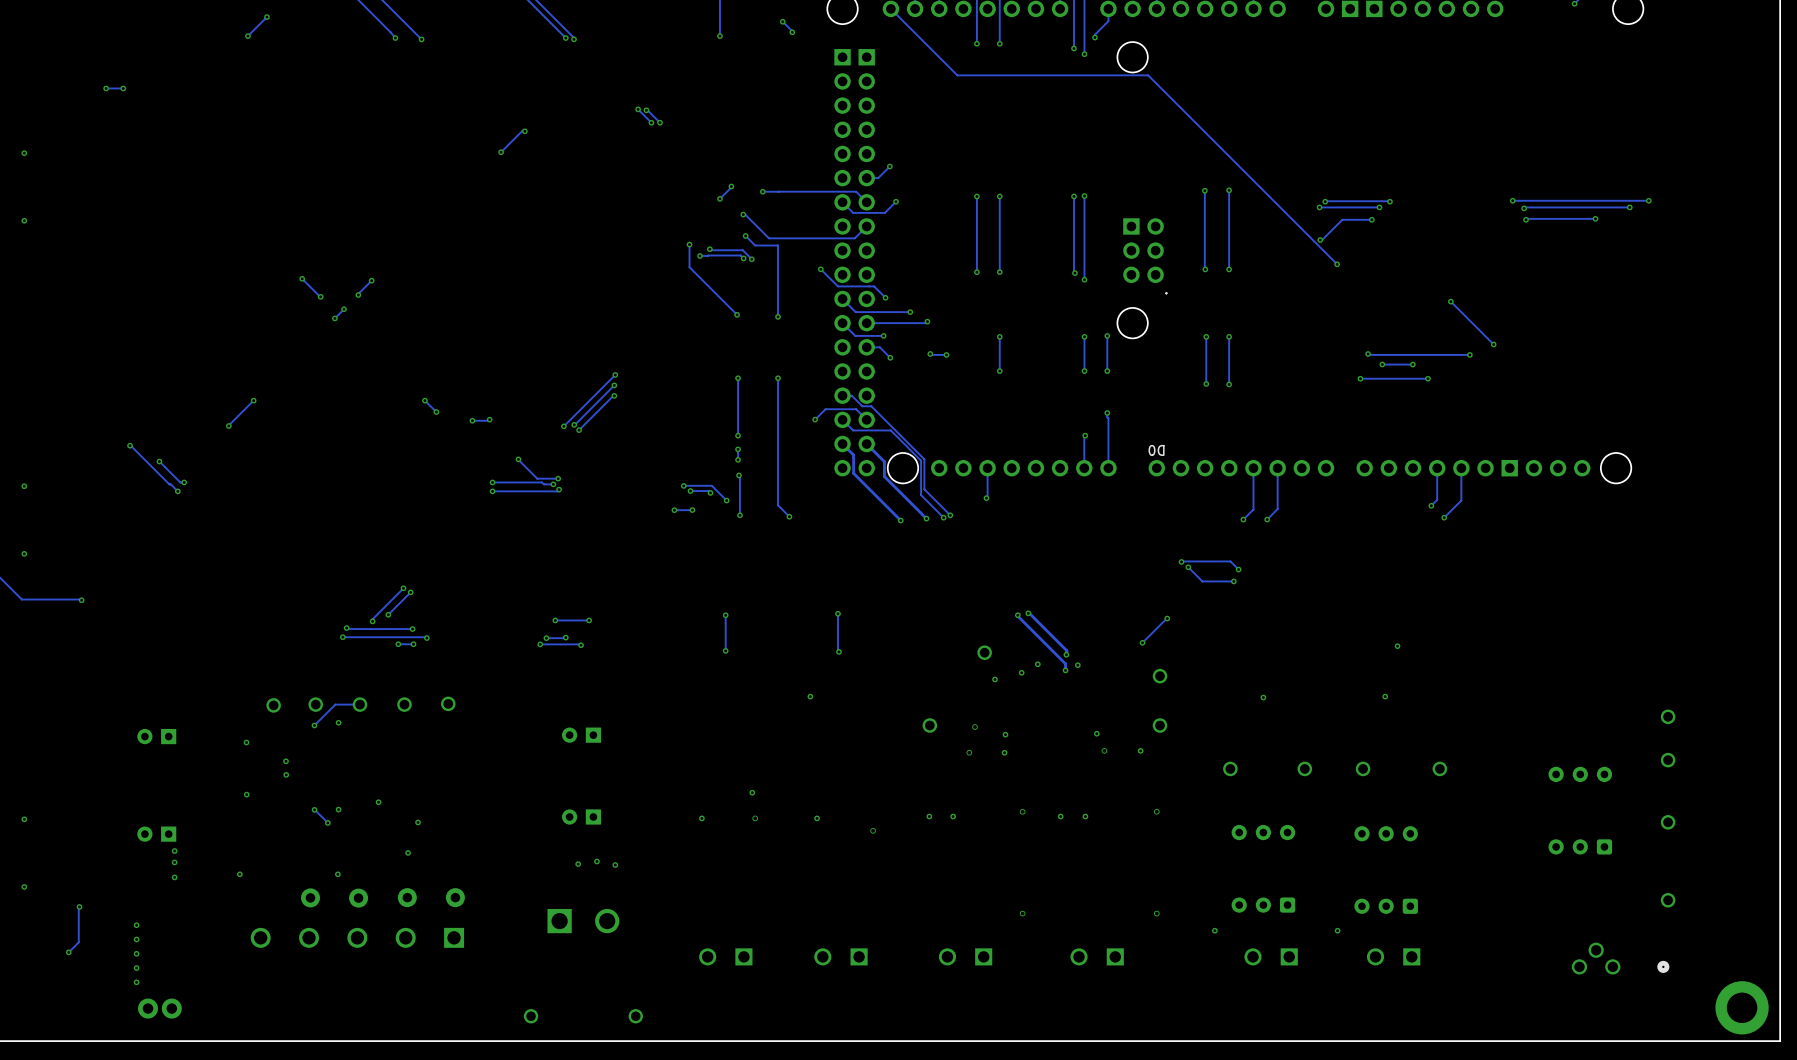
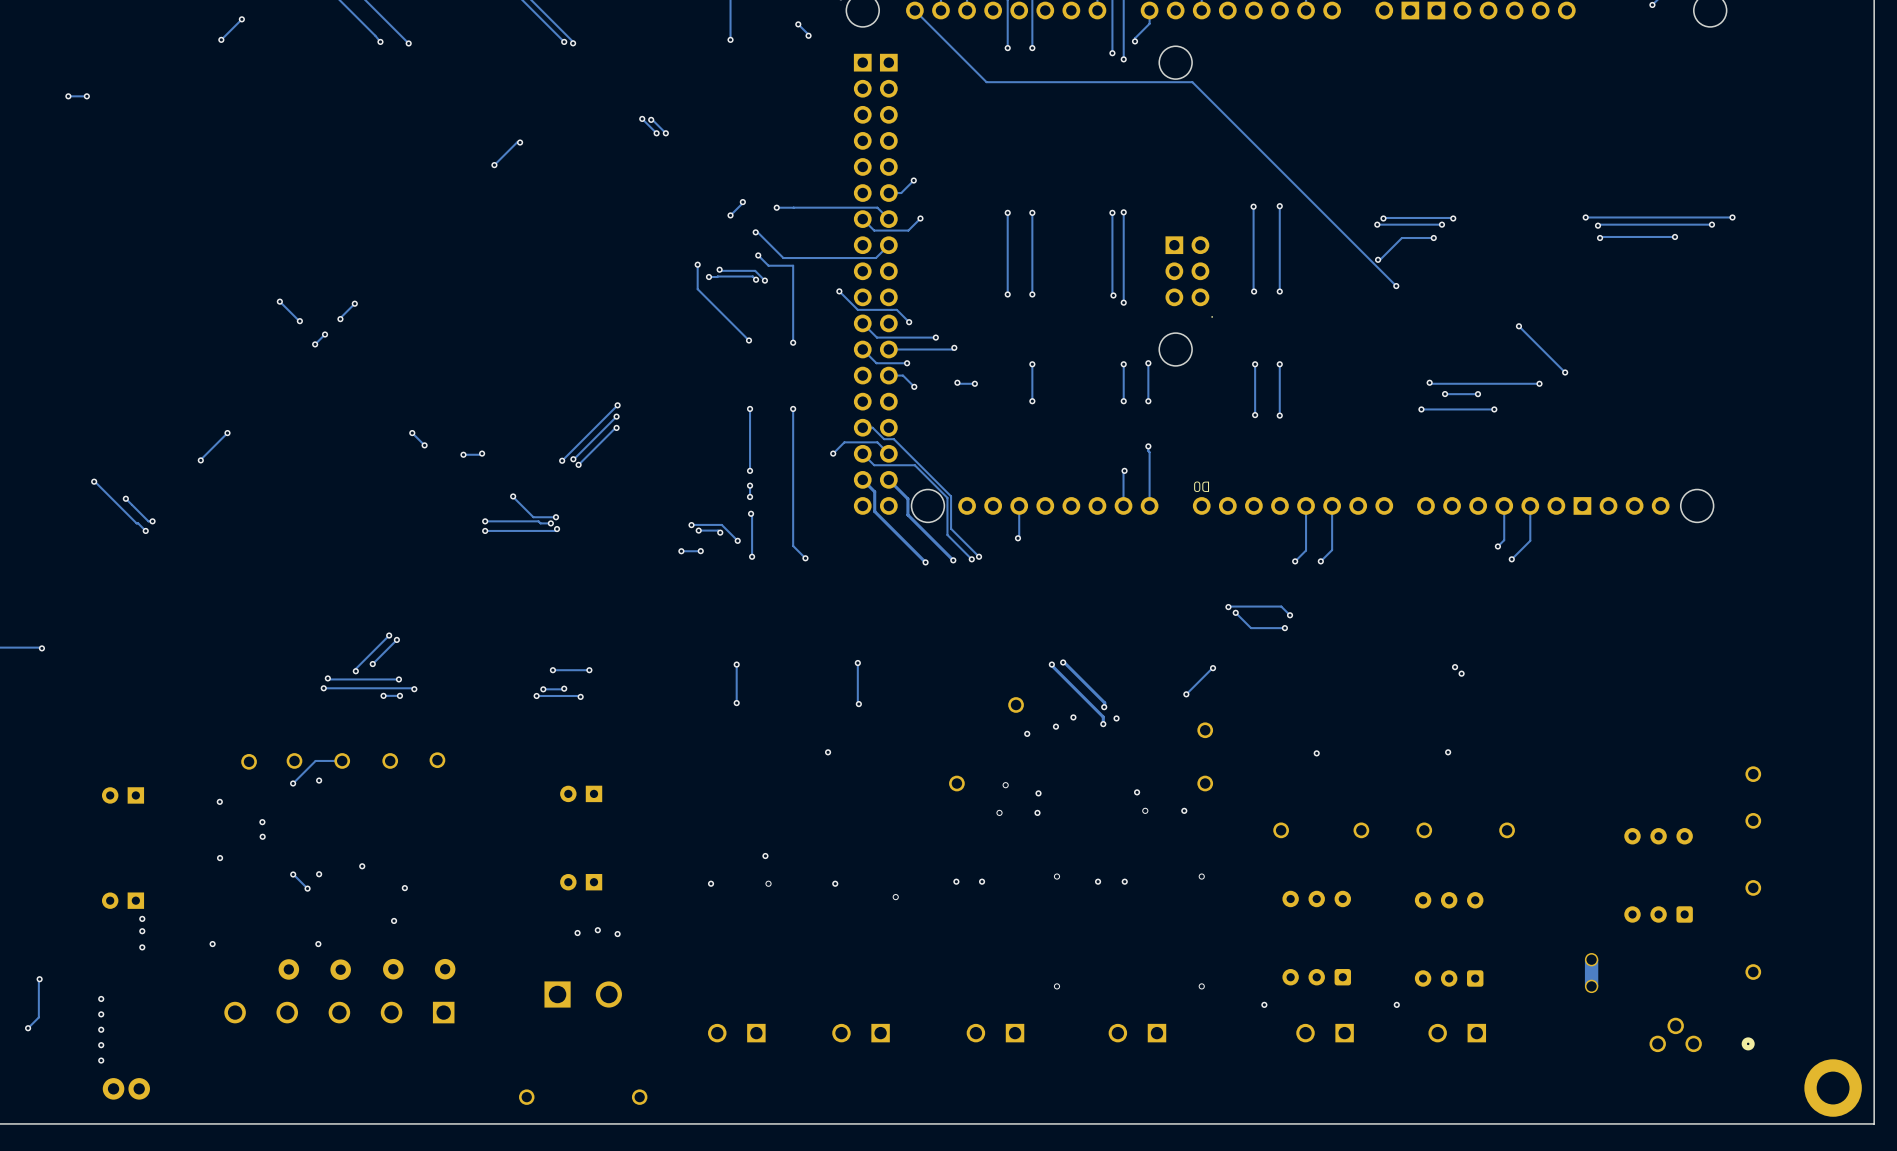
via: none -> (1455, 667)
via: none -> (1461, 673)
via: (1397, 646) -> none
part: none -> (1591, 973)

